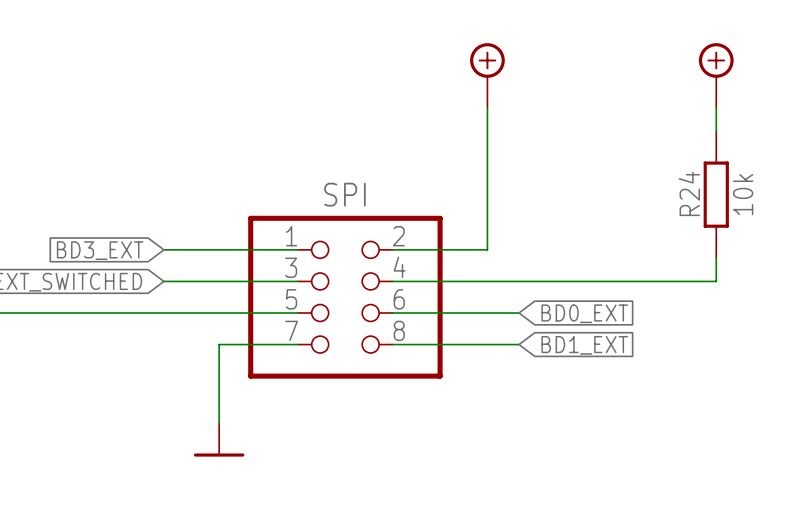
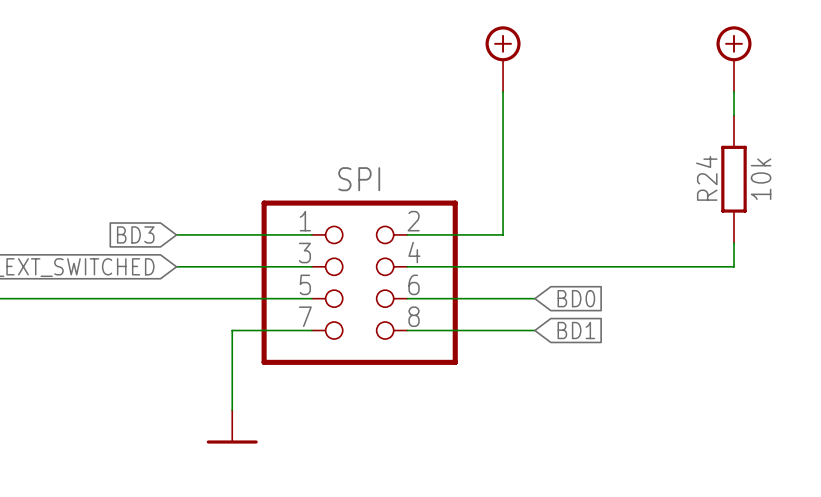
global label: BD3_EXT (100, 250) -> BD3 (135, 234)
global label: BD0_EXT (584, 313) -> BD0 (576, 298)
global label: BD1_EXT (584, 345) -> BD1 (576, 330)

